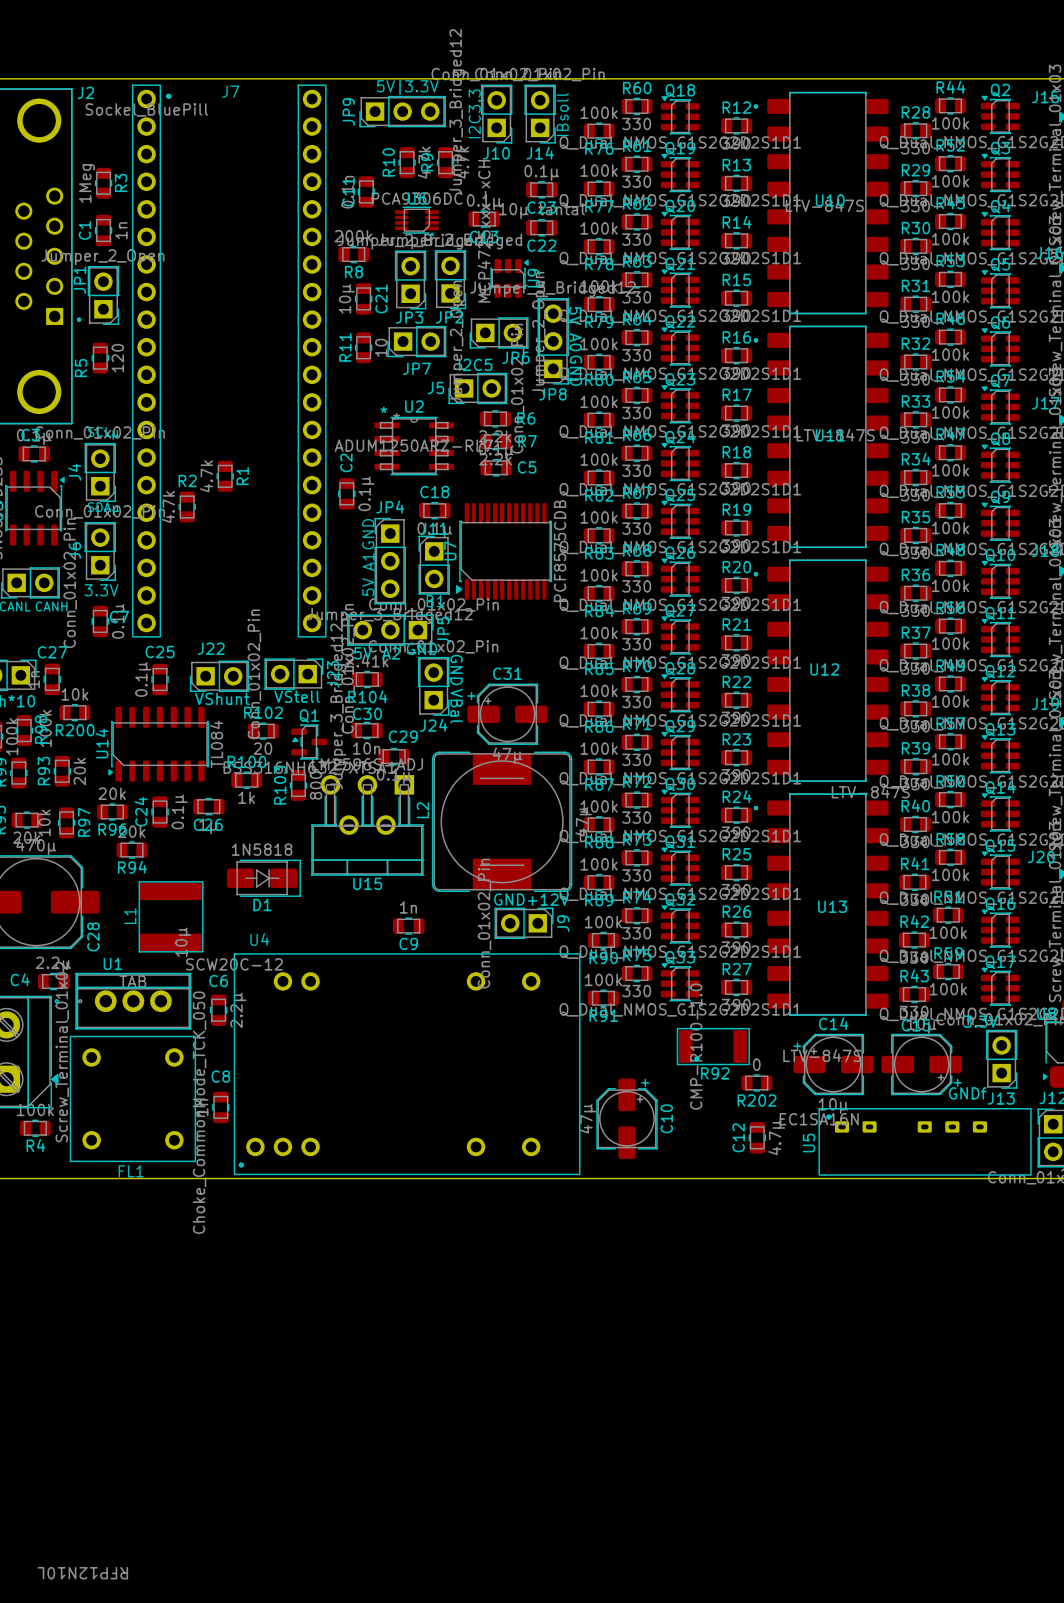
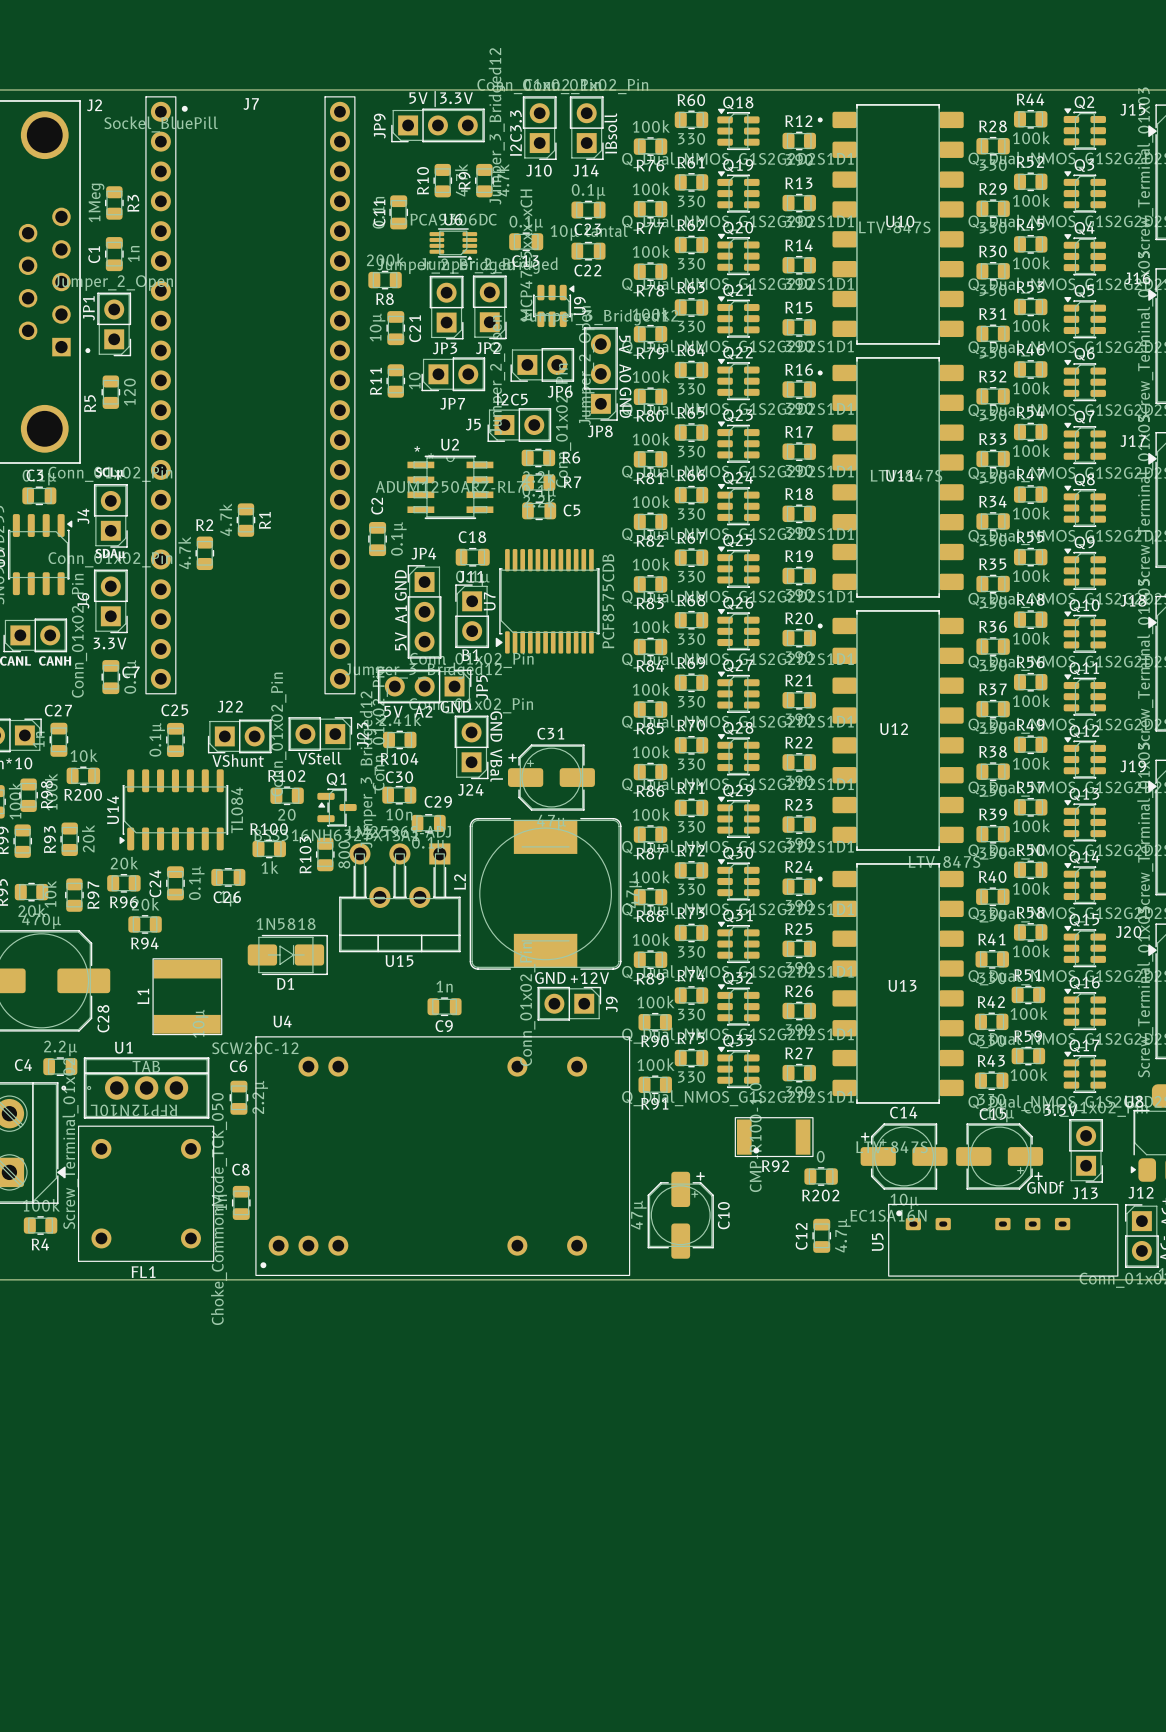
U1 value position: RFP12N10L (82, 1573) -> RFP12N10L (133, 1110)

